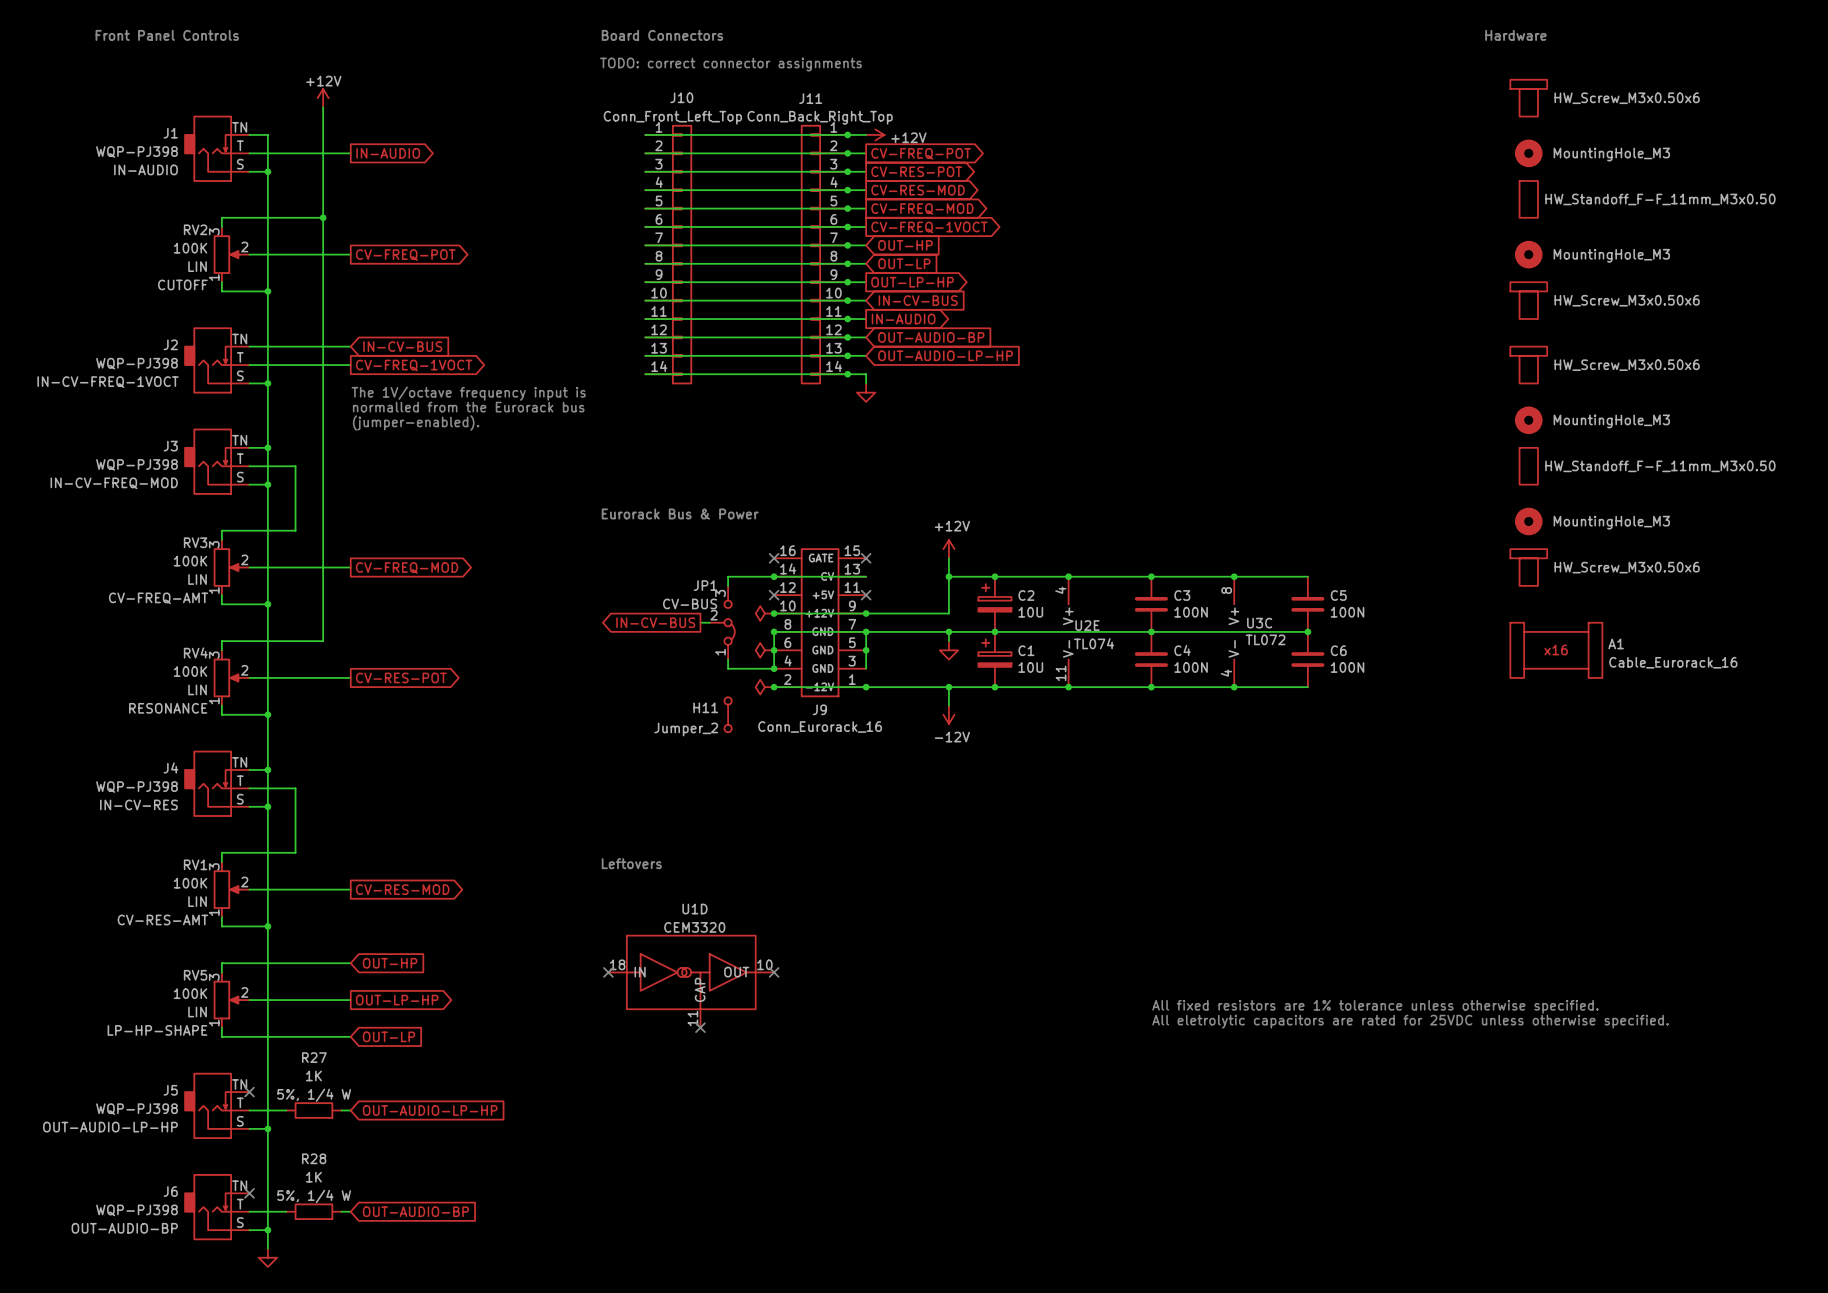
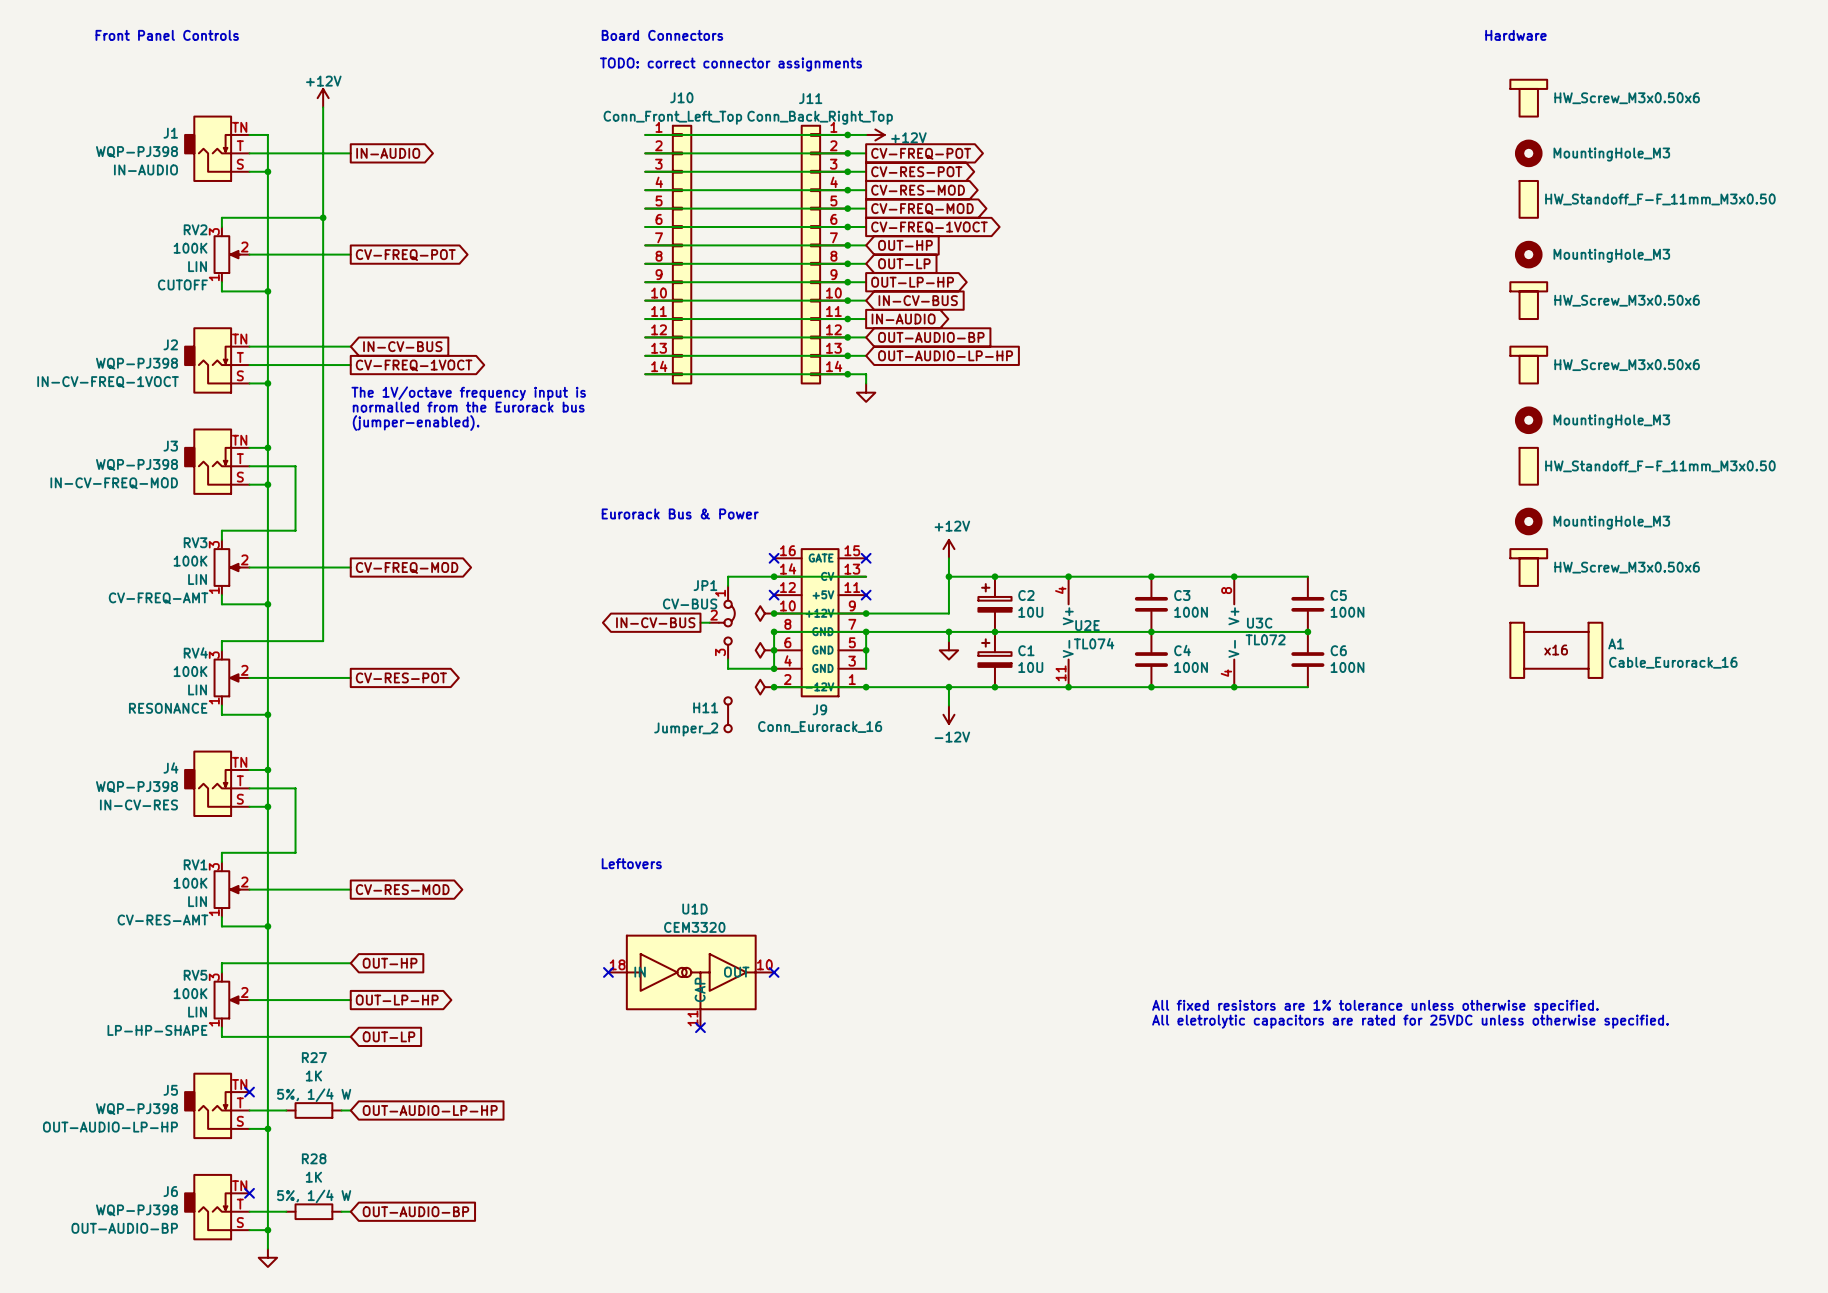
JP1 flip: as is (726, 622) -> up-down (726, 622)

